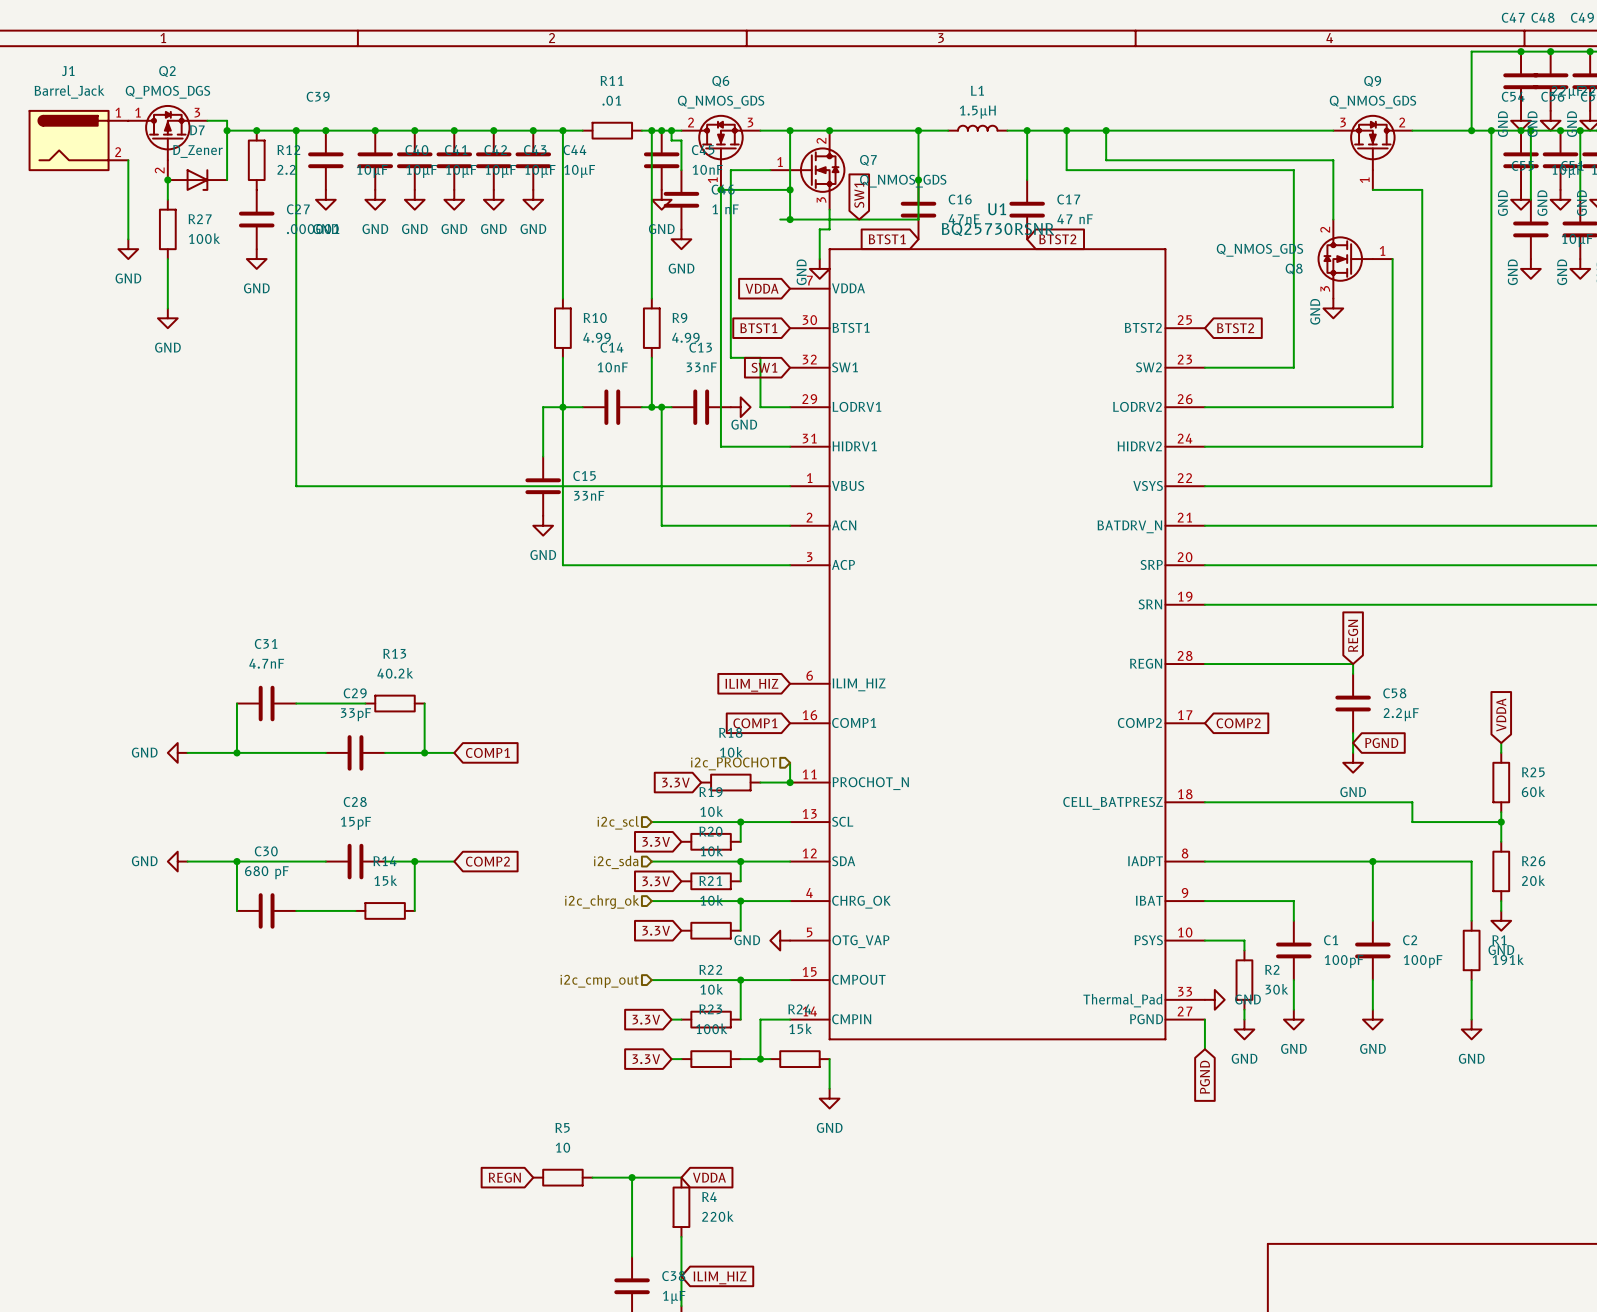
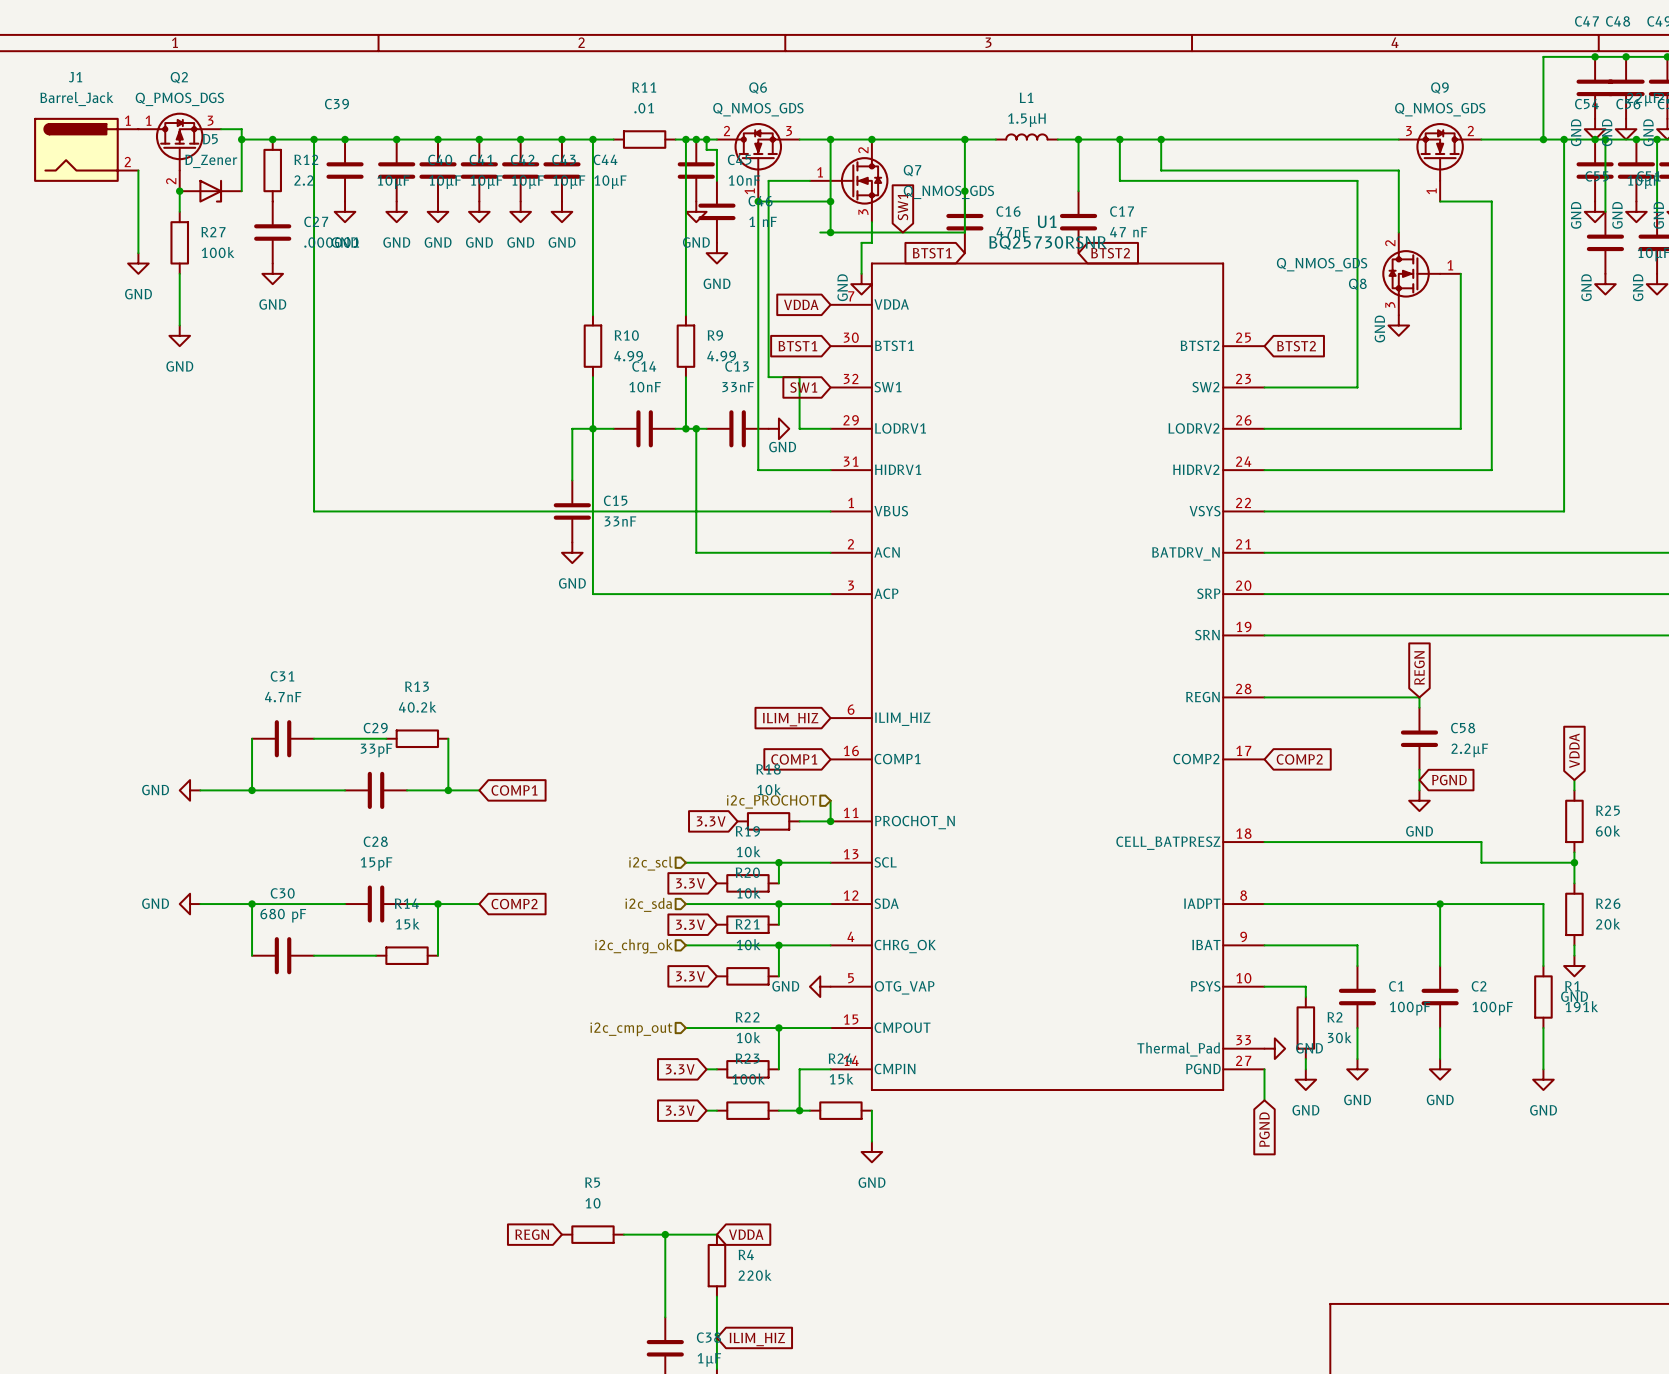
D7 name: D7 (197, 130) -> D5 (210, 139)

